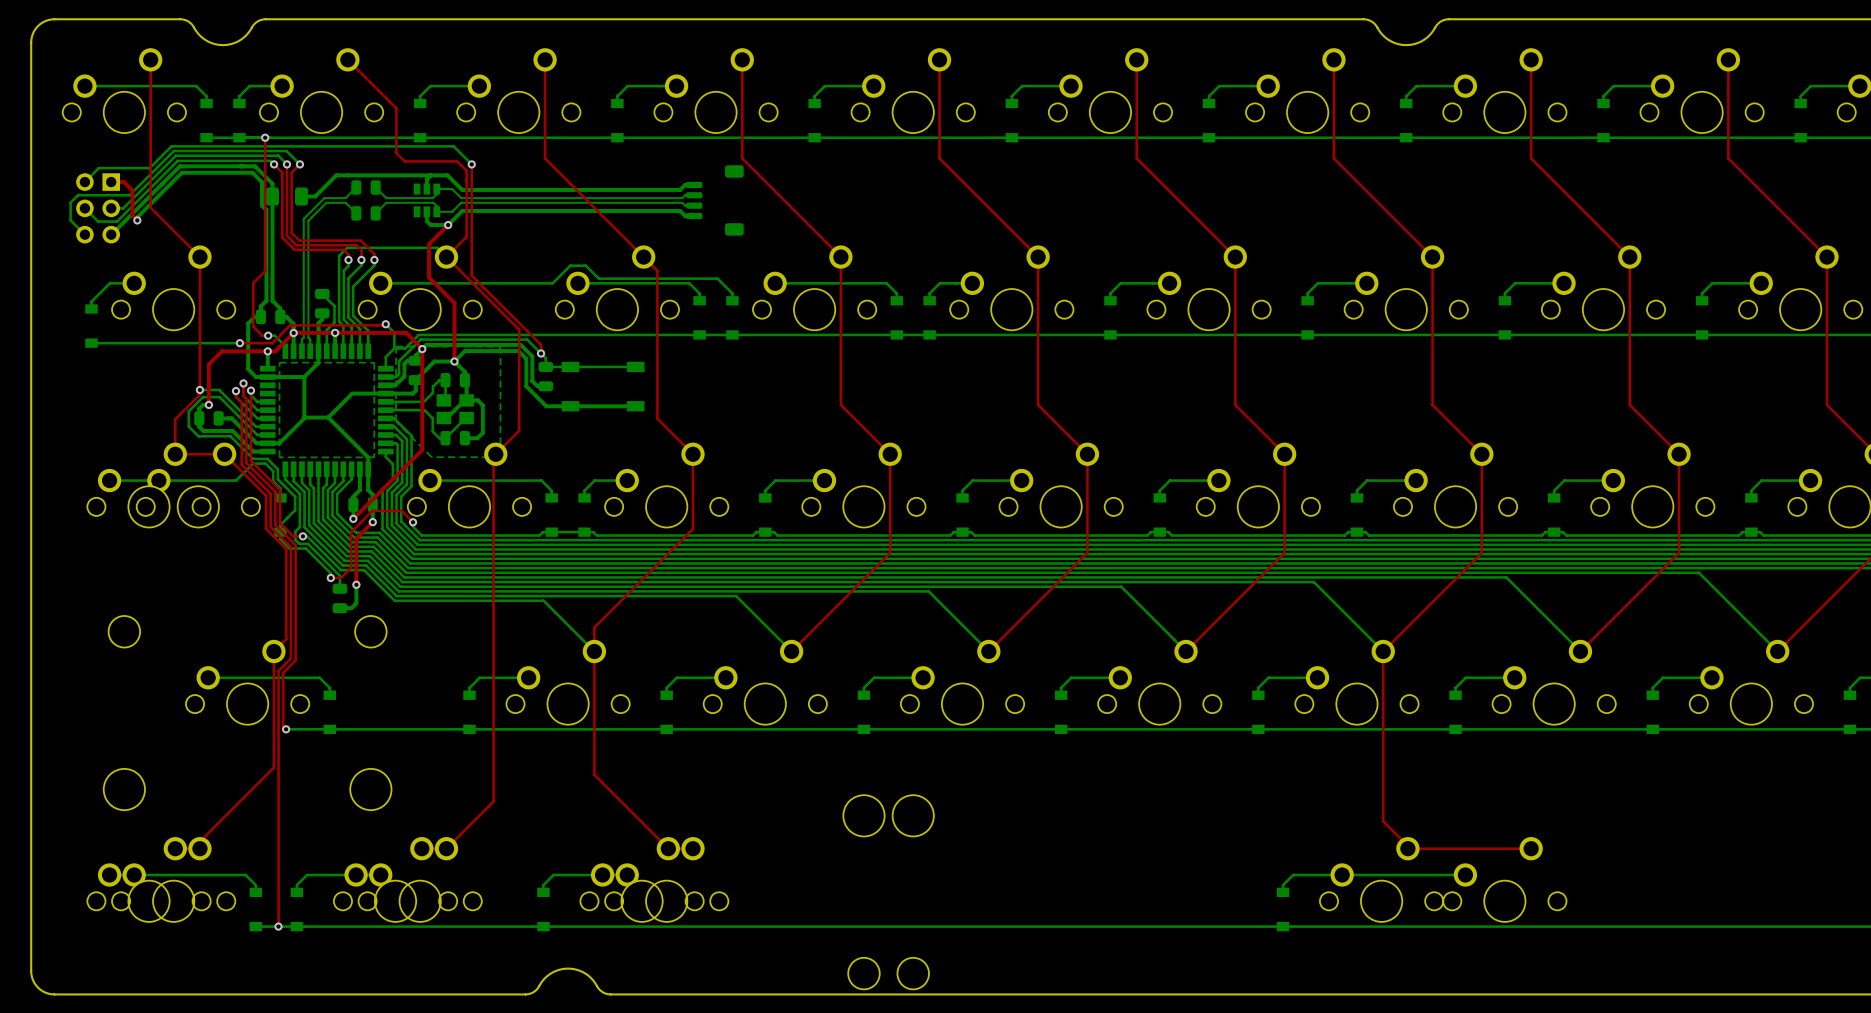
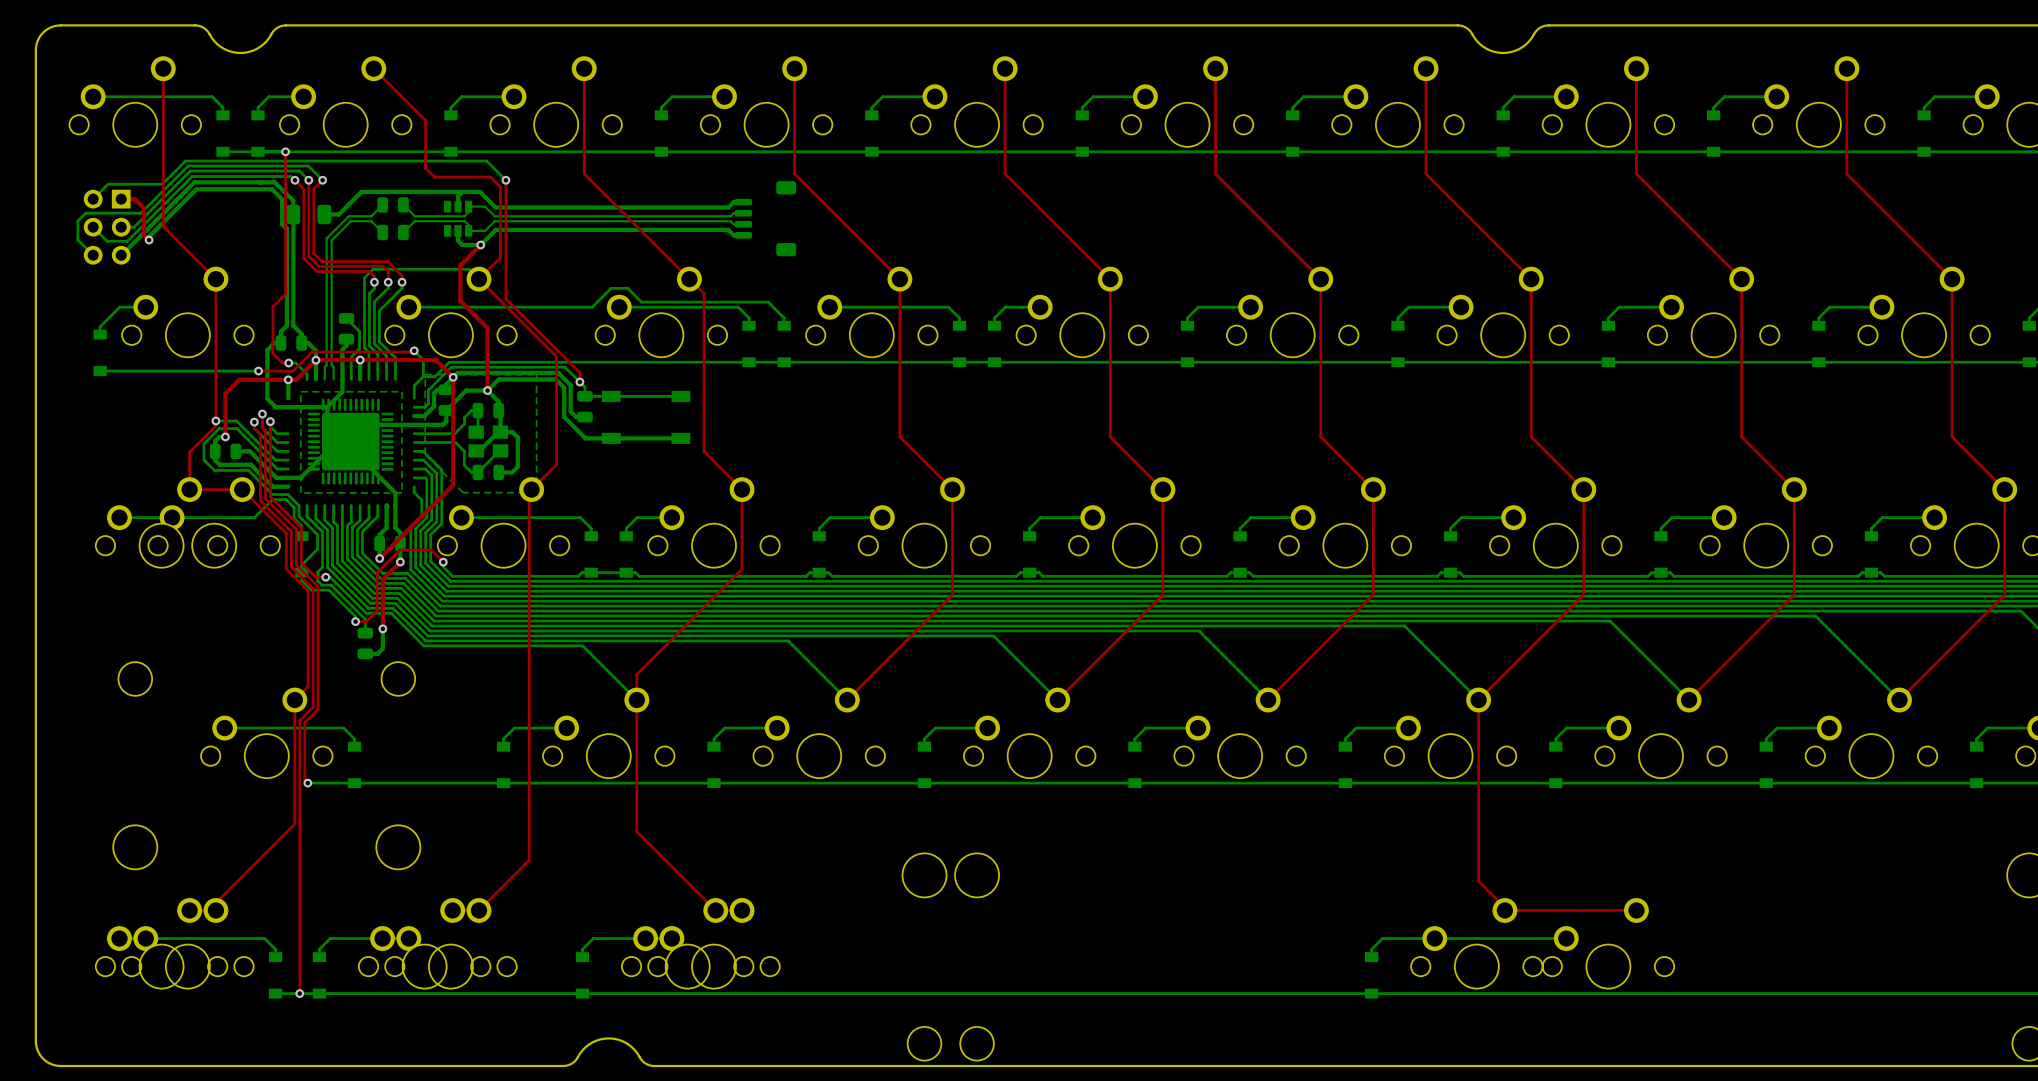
part footprint: [260, 343, 394, 477] -> [307, 398, 394, 485]

